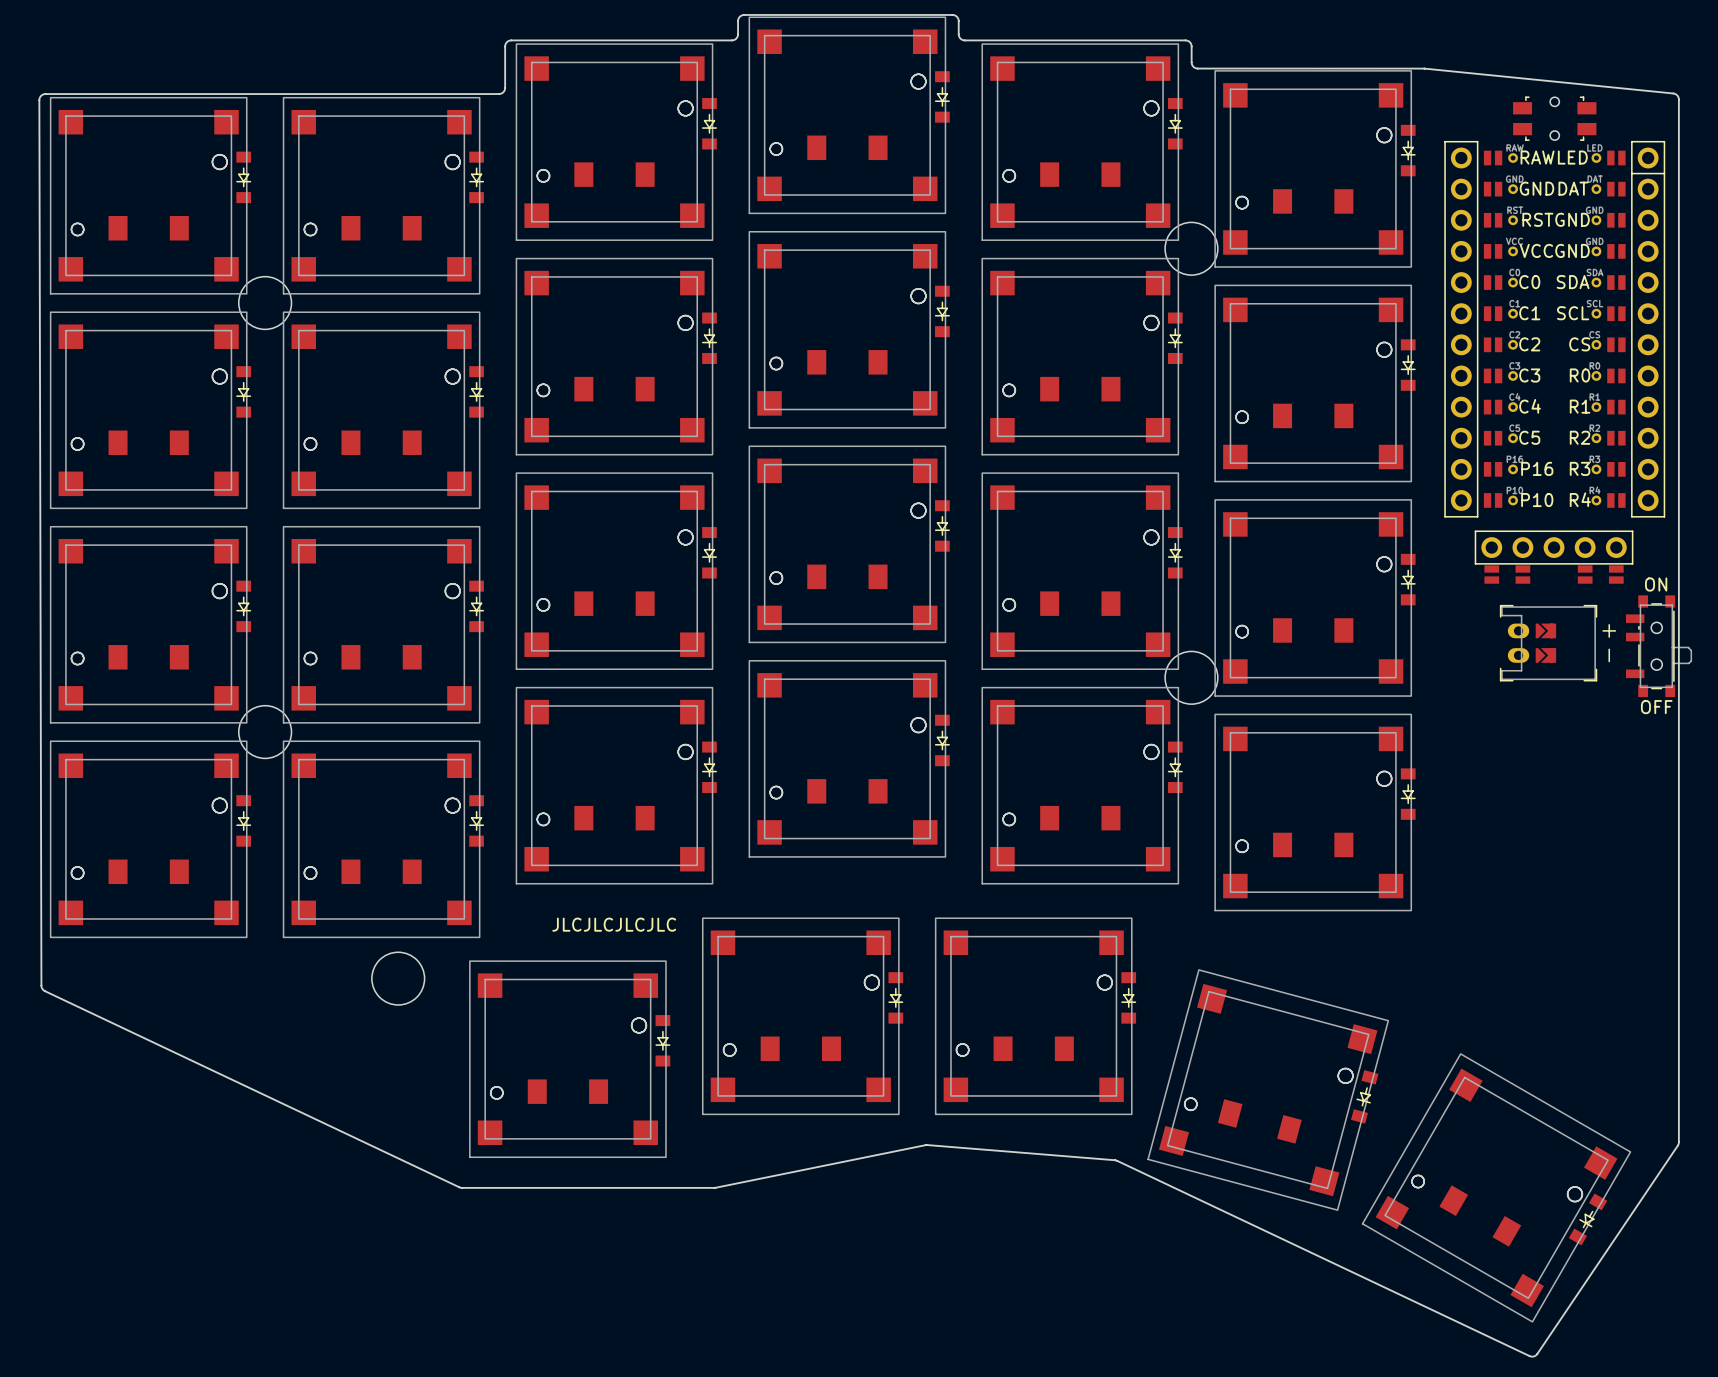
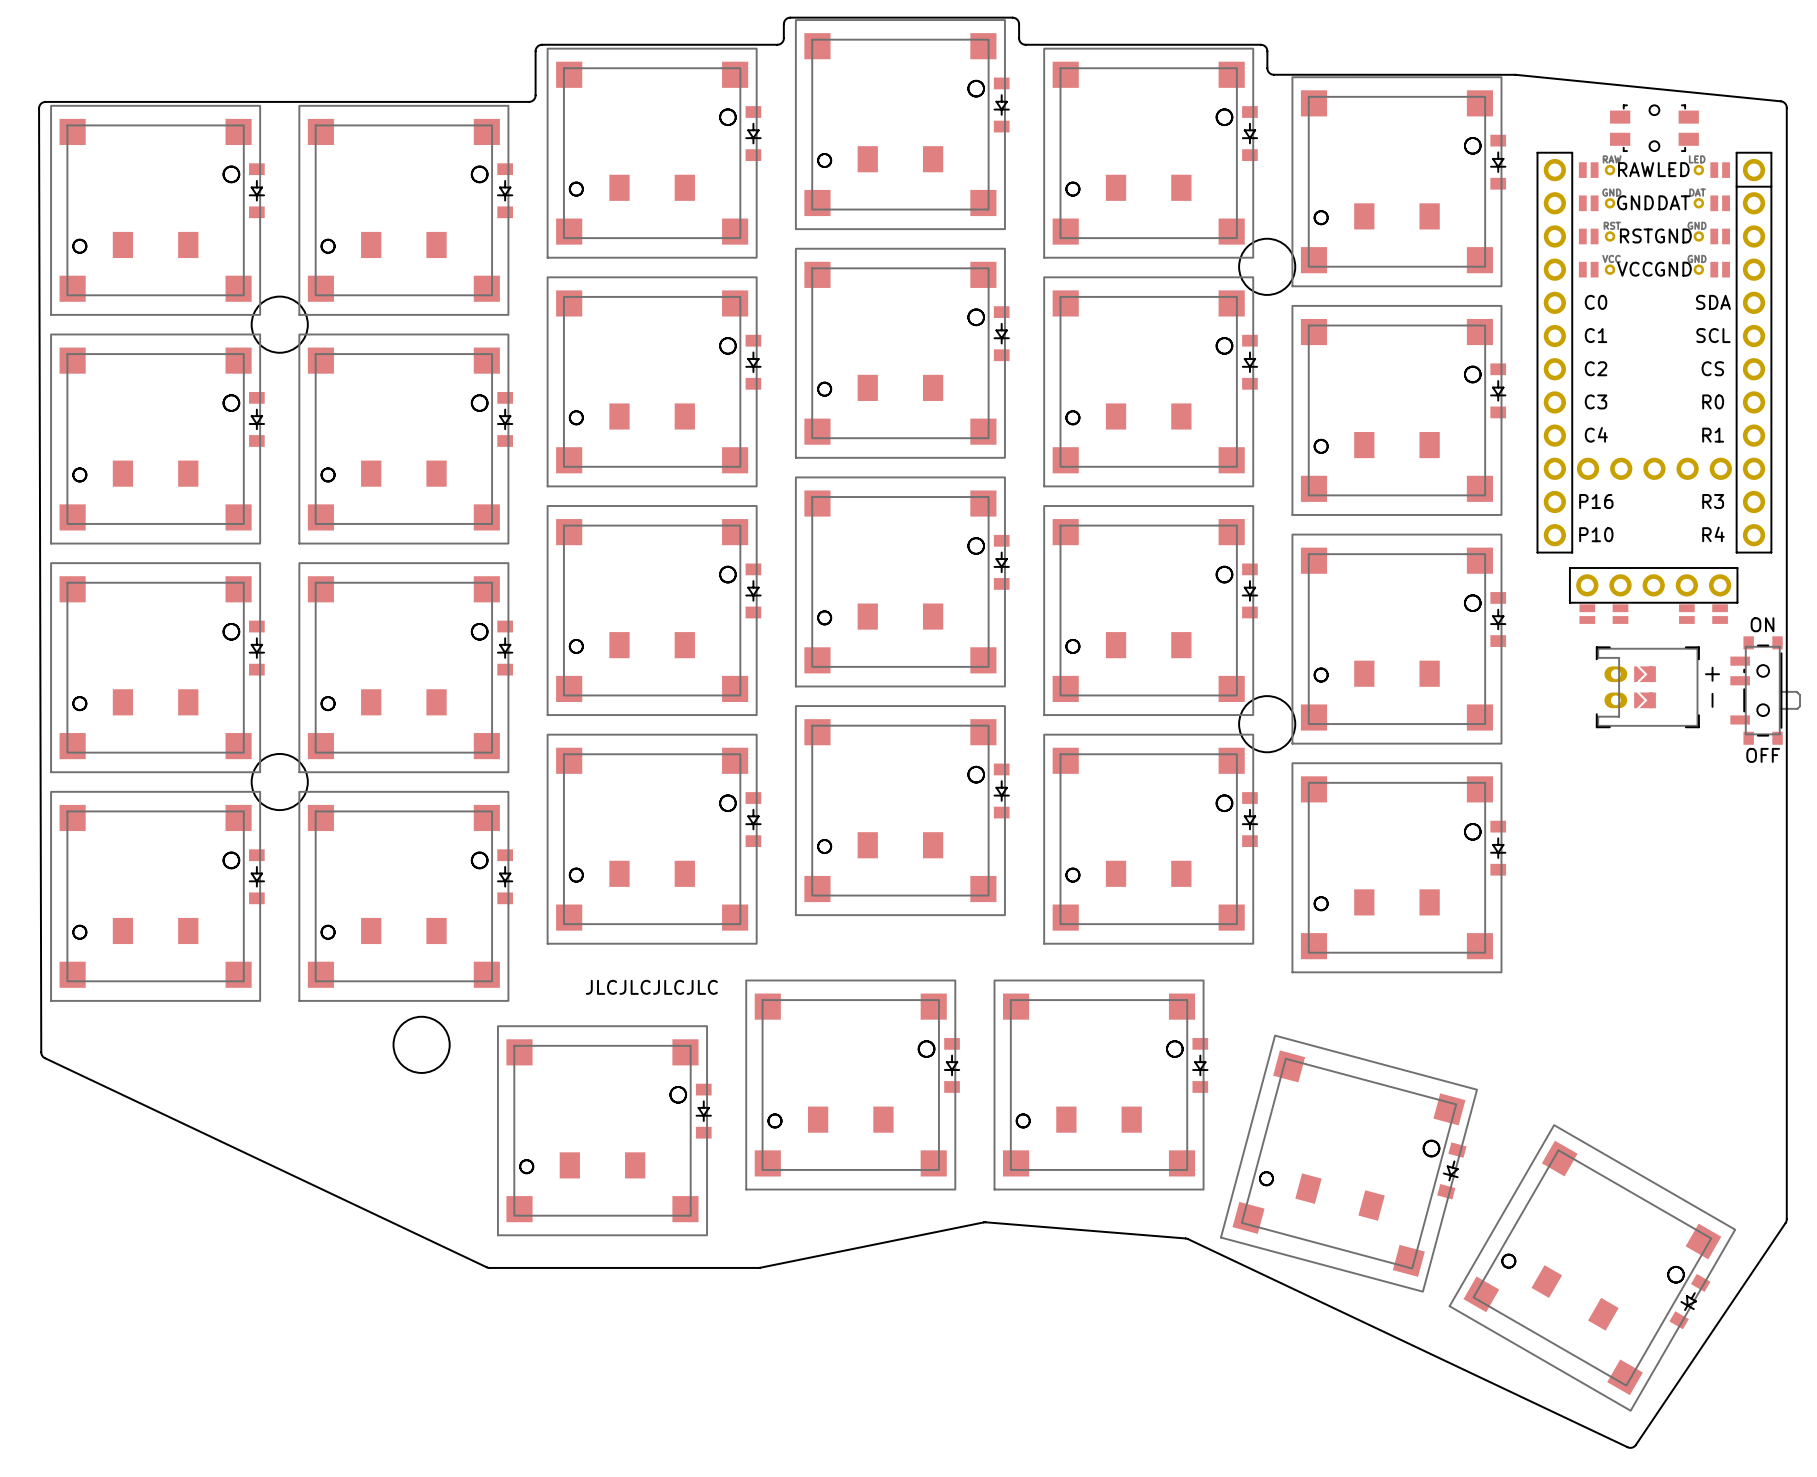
part footprint: [1444, 140, 1666, 518] -> [1536, 151, 1773, 554]

